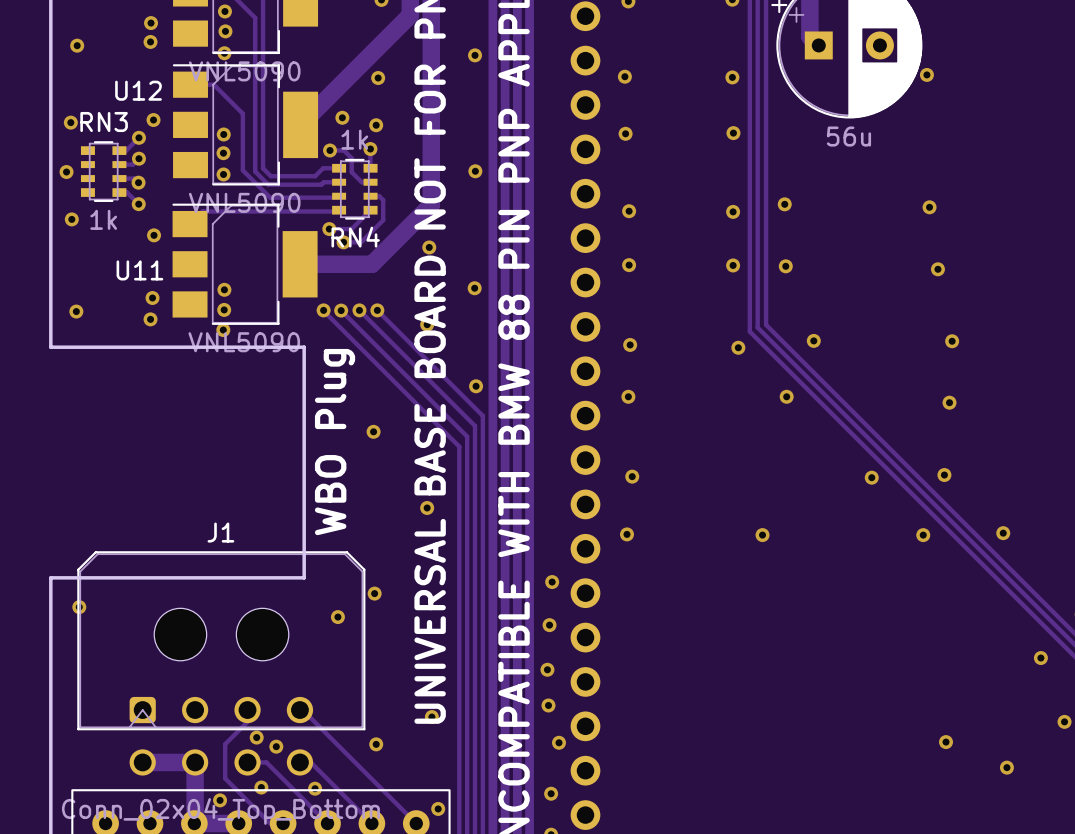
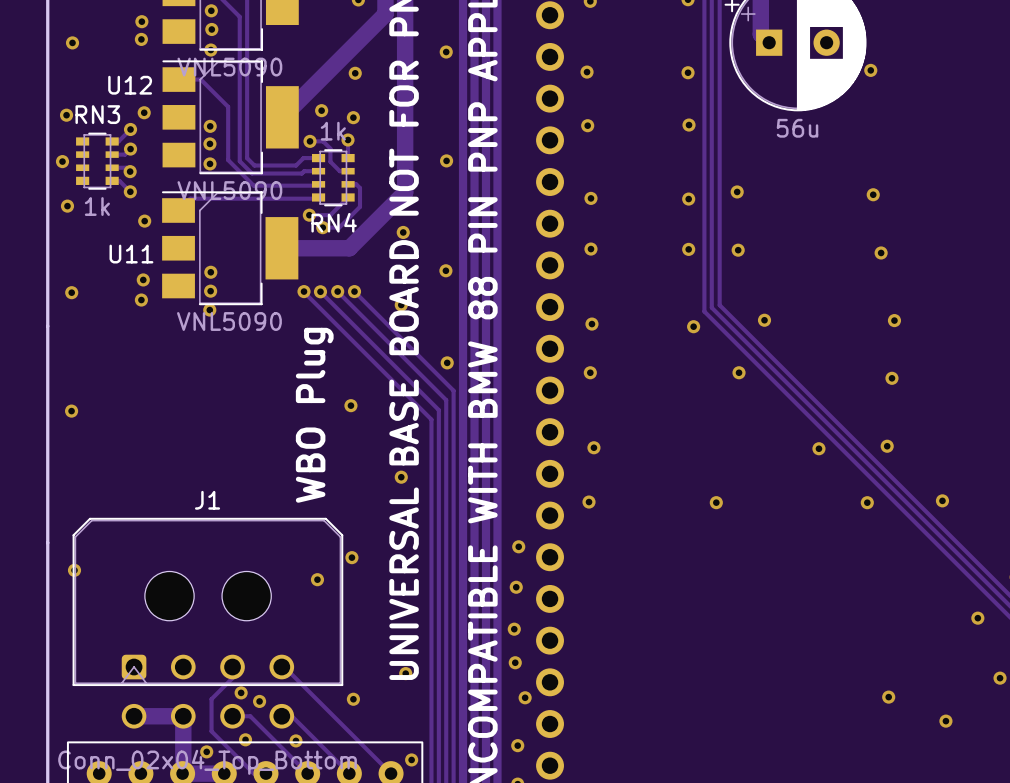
board edge: (50, 347) (304, 347) (304, 577) (50, 577) -> (47, 326) (47, 542)
via: none -> (71, 411)

